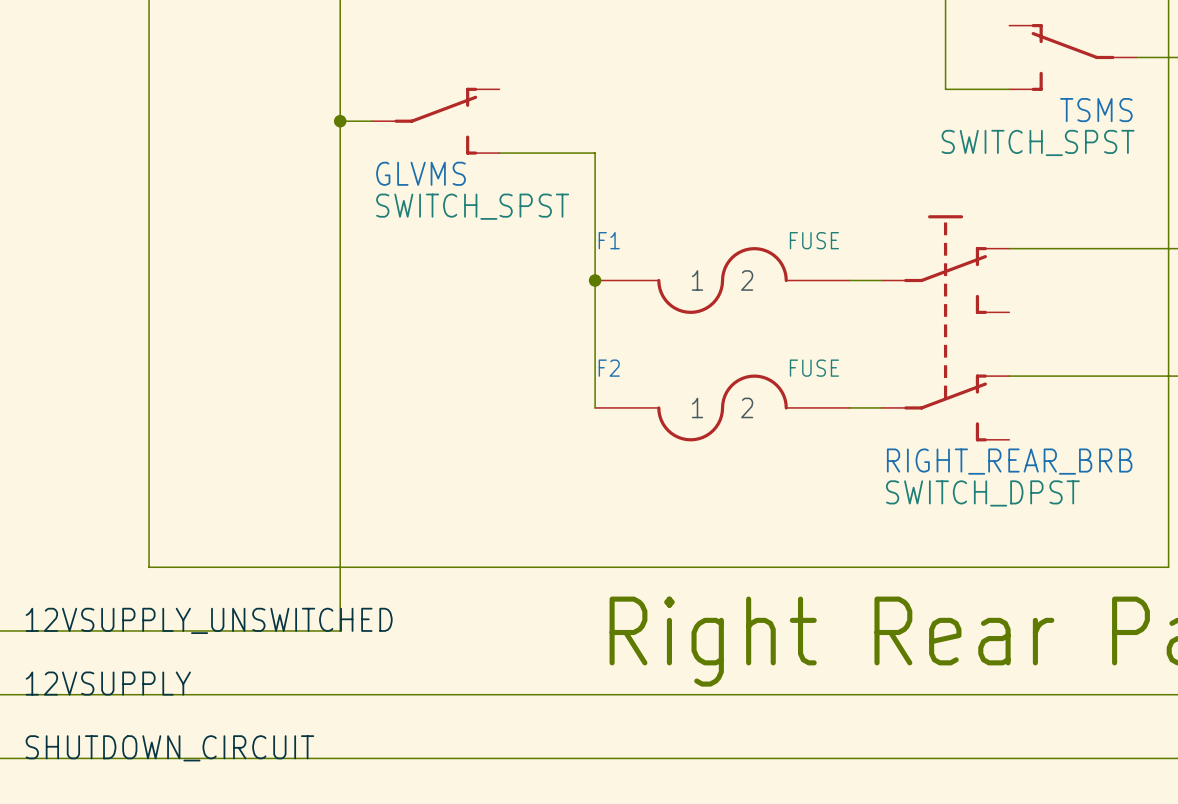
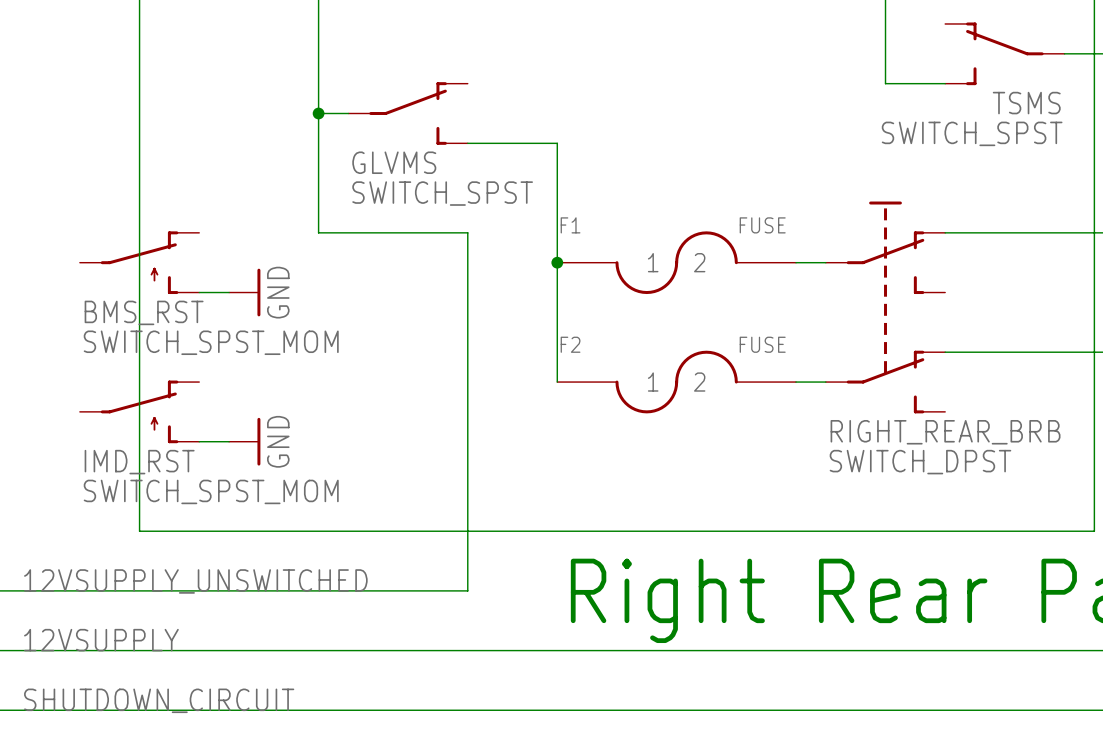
wire: (340, 248) (340, 630) -> (318, 232) (467, 232) (467, 590) (318, 590)
BMS_RST: none -> SWITCH_SPST_MOM (139, 262)
wire: none -> (199, 292) (229, 292)
power symbol: none -> GND (244, 292)
IMD_RST: none -> SWITCH_SPST_MOM (139, 411)
wire: none -> (199, 441) (229, 441)
power symbol: none -> GND (244, 441)

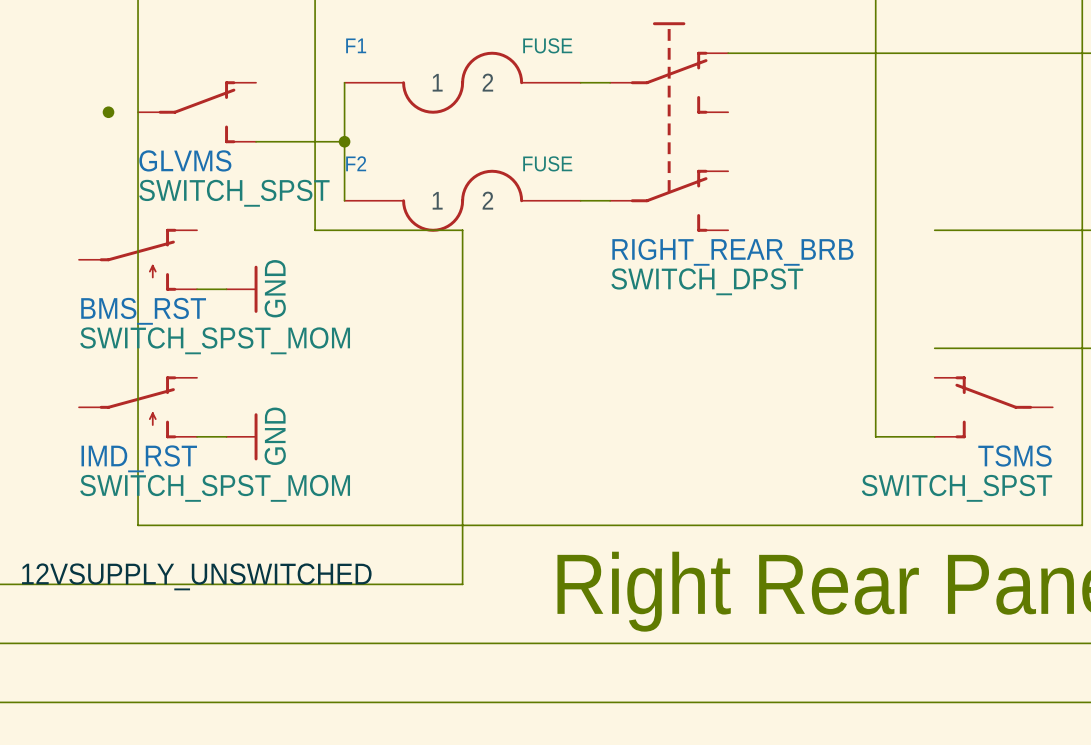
wire: none -> (728, 53) (1052, 53)
TSMS: SWITCH_SPST (1004, 53) -> none
wire: none -> (344, 82) (344, 200)
wire: (885, 83) (945, 83) -> (875, 82) (875, 436) (934, 436)
junction: none -> (108, 112)
wire: (318, 113) (348, 113) -> none
junction position: (318, 113) -> (344, 141)
GLVMS position: (408, 113) -> (197, 112)
wire: none -> (256, 141) (344, 141)
wire: (467, 143) (557, 143) (557, 382) -> none
junction: (557, 262) -> none
F1 position: (676, 262) -> (462, 82)
wire: (795, 262) (825, 262) -> (580, 82) (610, 82)
RIGHT_REAR_BRB position: (885, 307) -> (669, 127)
F2 position: (676, 382) -> (462, 200)
wire: (795, 382) (825, 382) -> (580, 200) (610, 200)
TSMS: none -> SWITCH_SPST (993, 407)
label: 12VSUPPLY (101, 640) -> none
label: SHUTDOWN_CIRCUIT (159, 700) -> none

